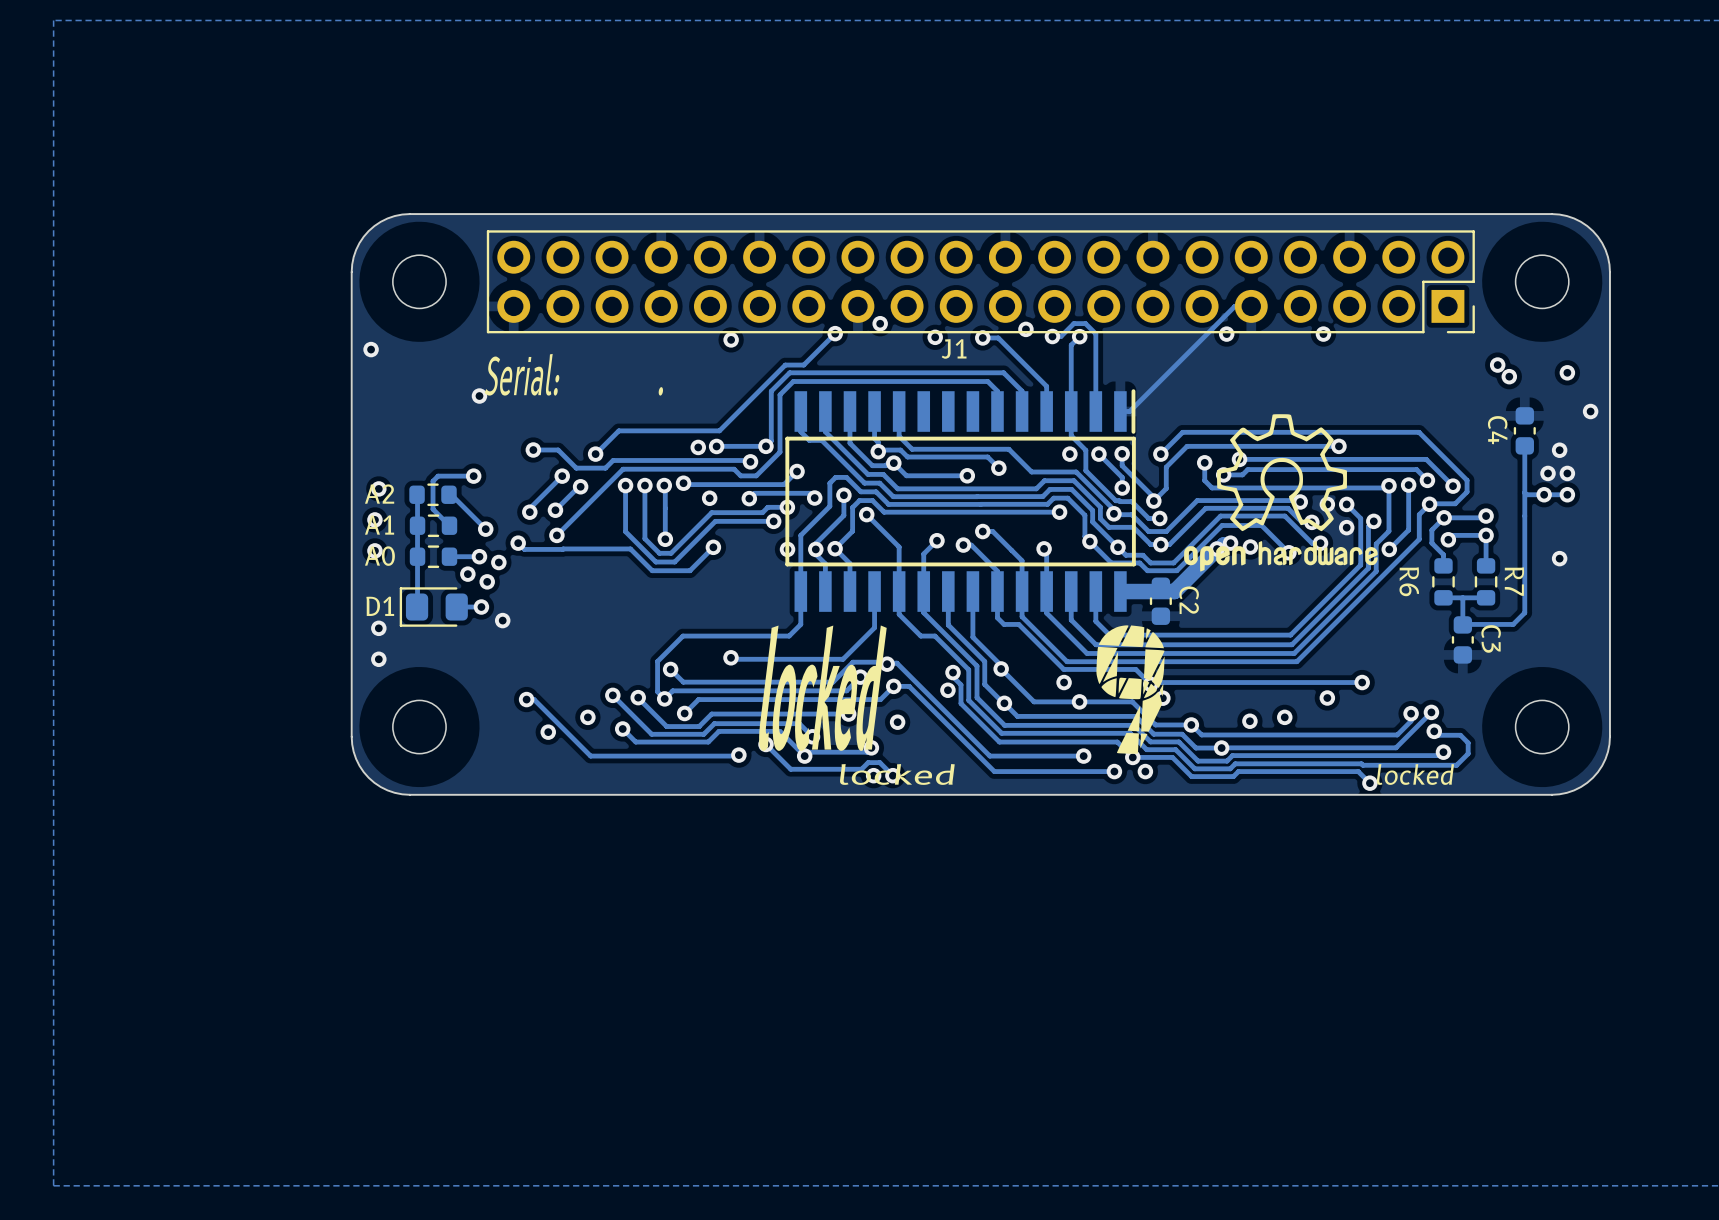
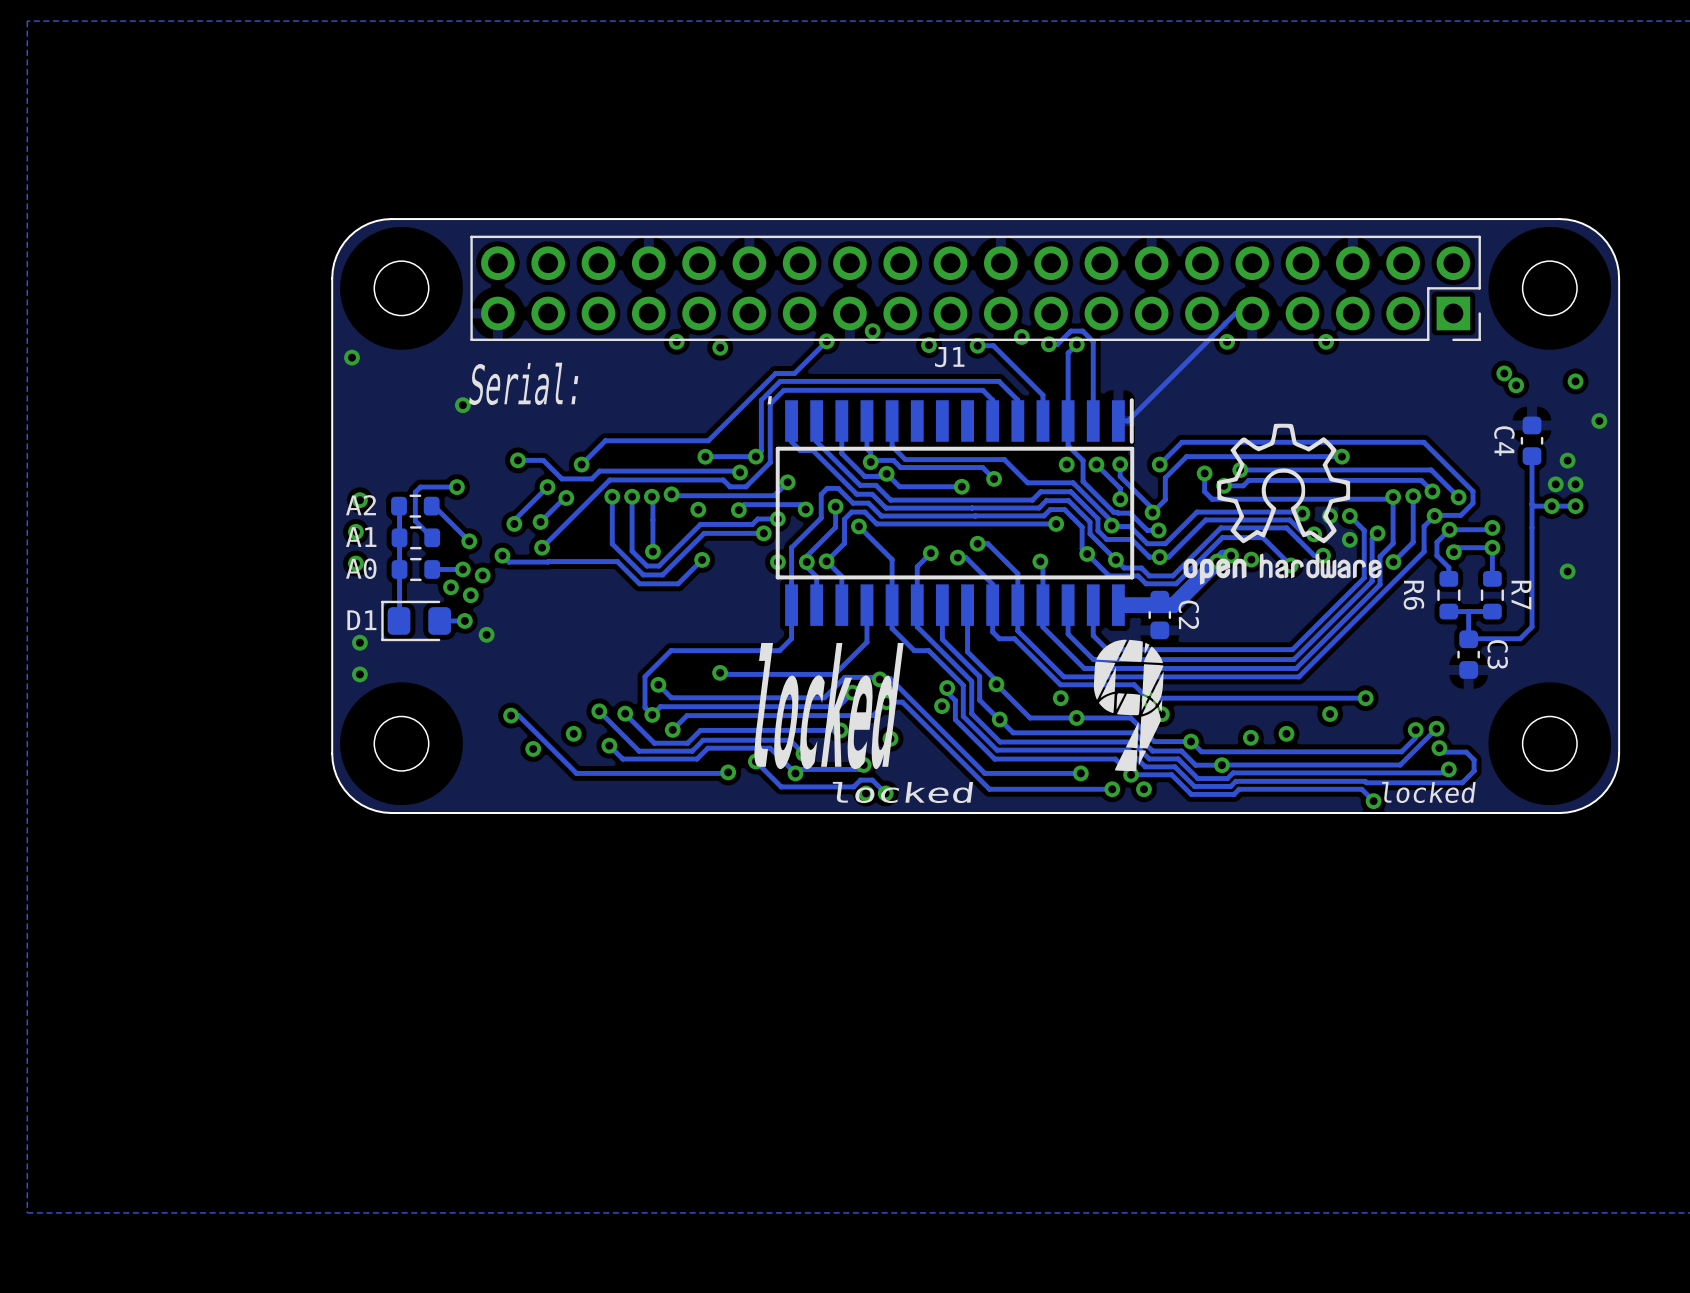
via position: (698, 447) -> (676, 341)

